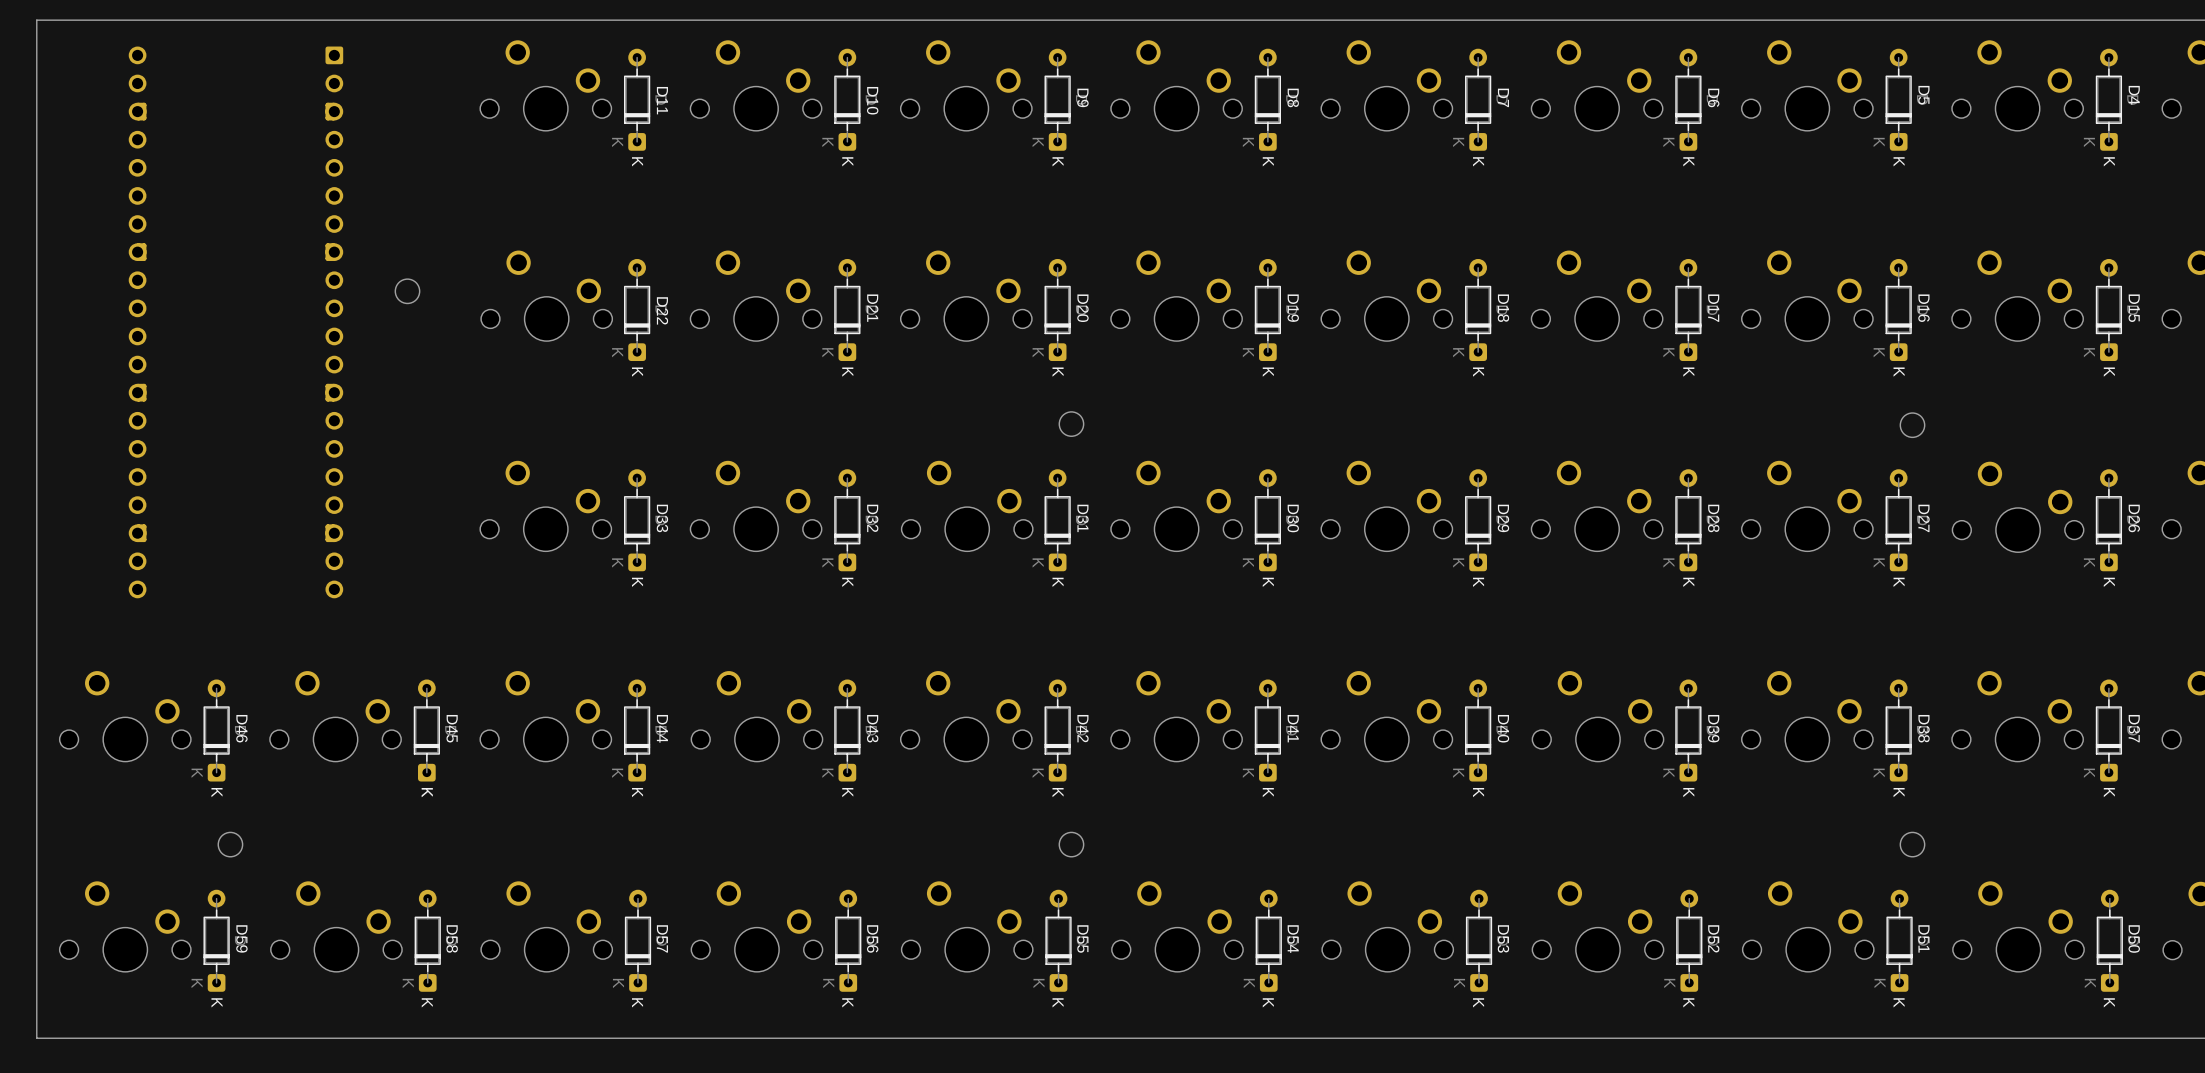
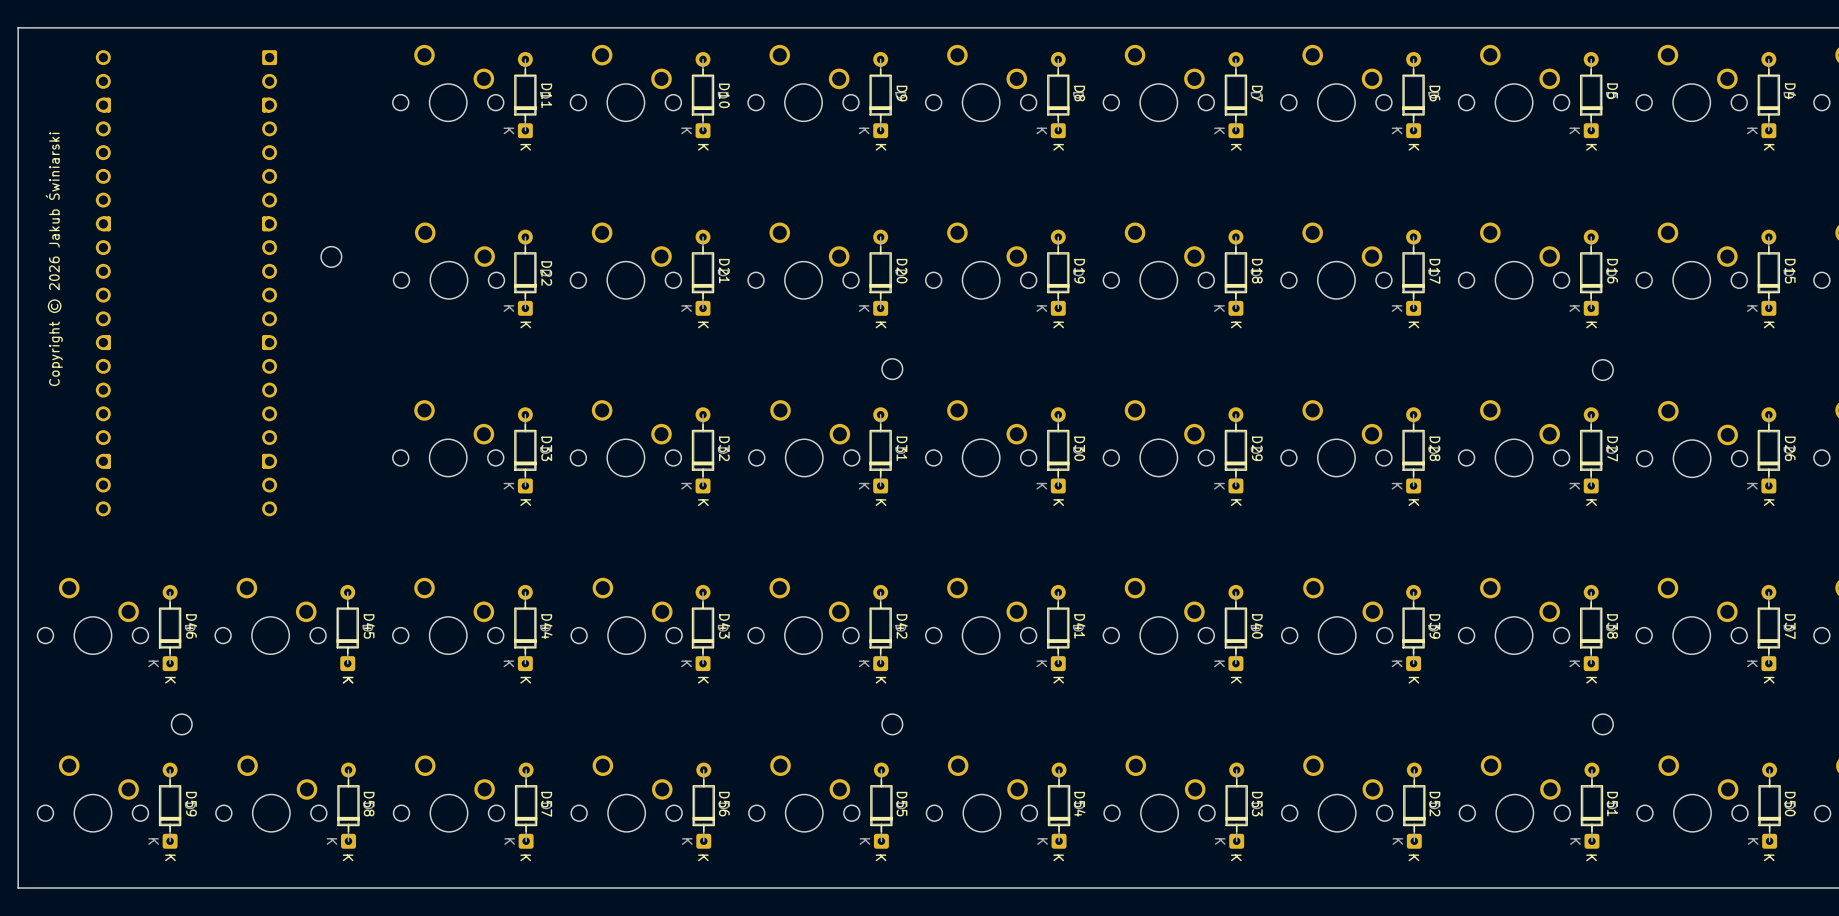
text: none -> Copyright © 2026 Jakub Świniarski (54, 259)

